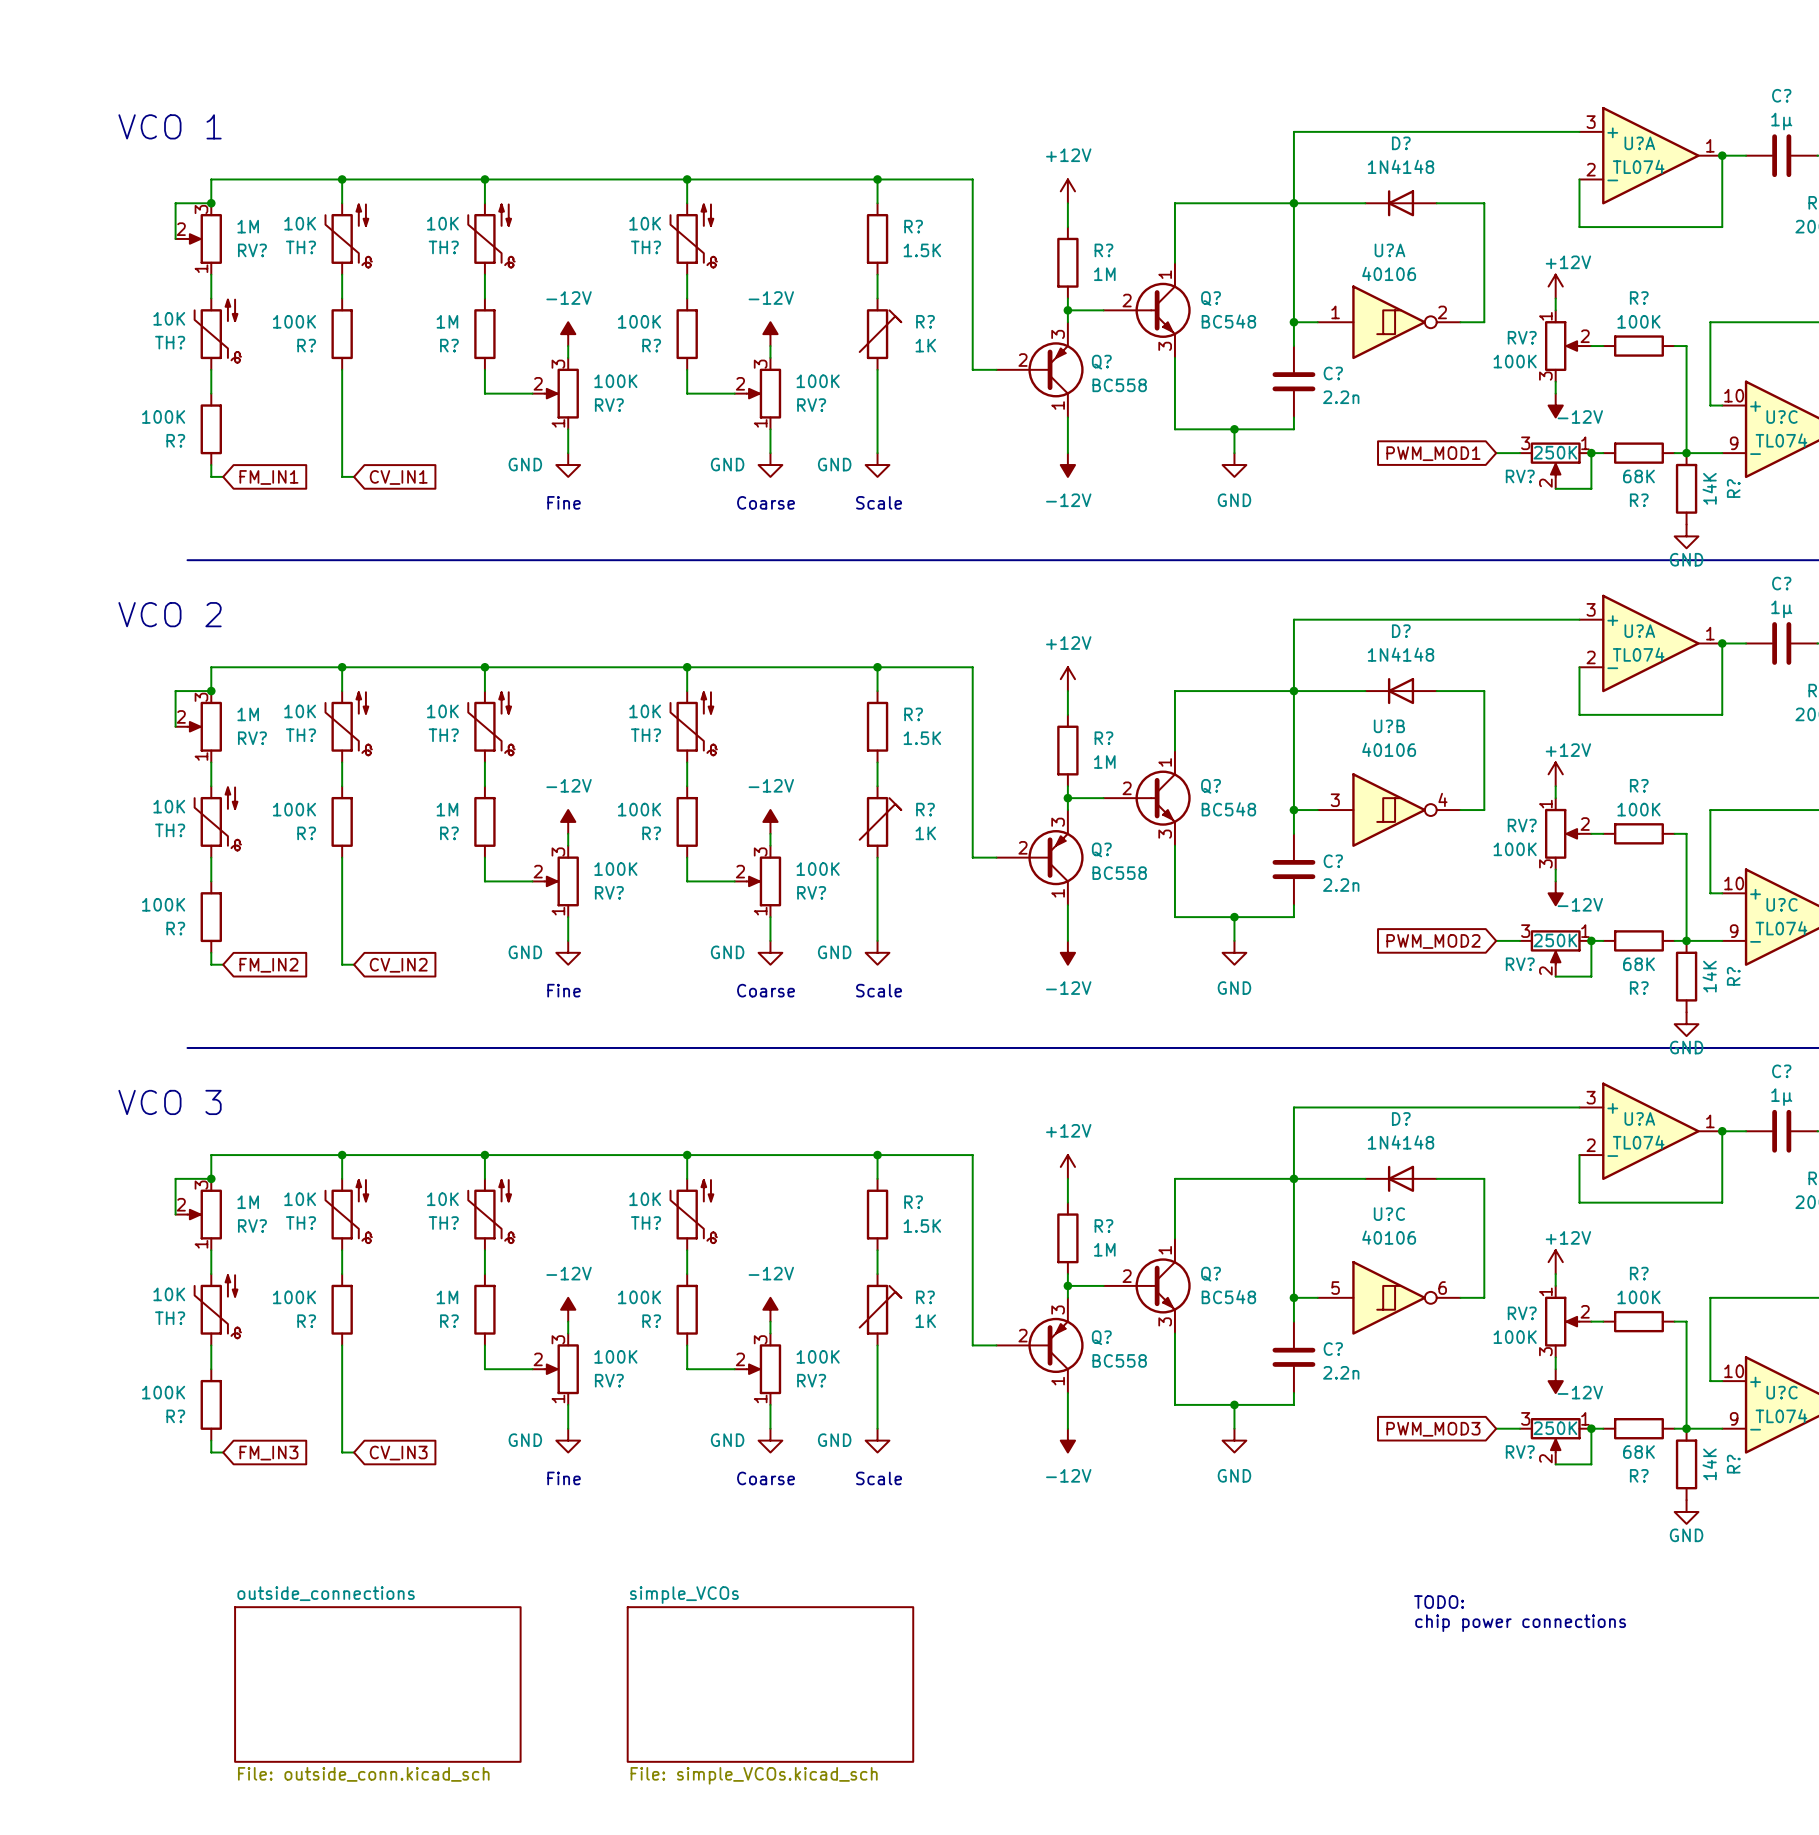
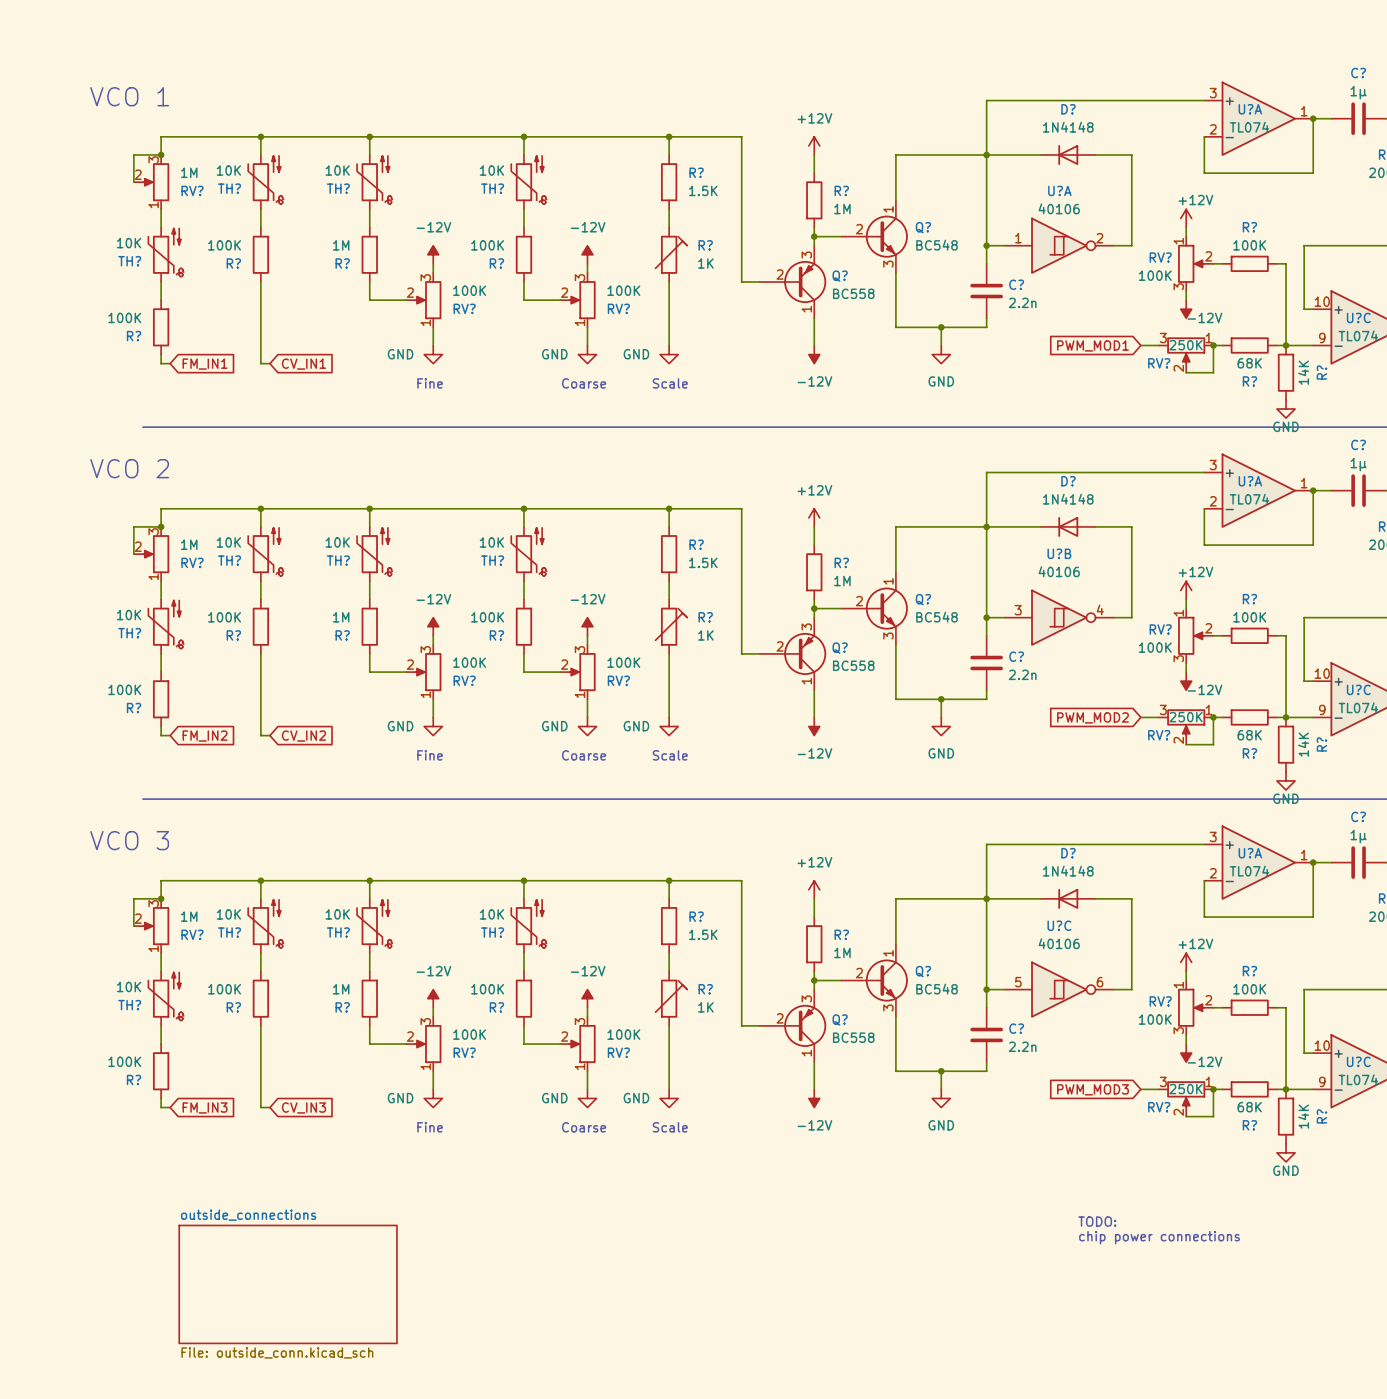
sheet simple_VCOs: File: simple_VCOs.kicad_sch (770, 1684) -> none

